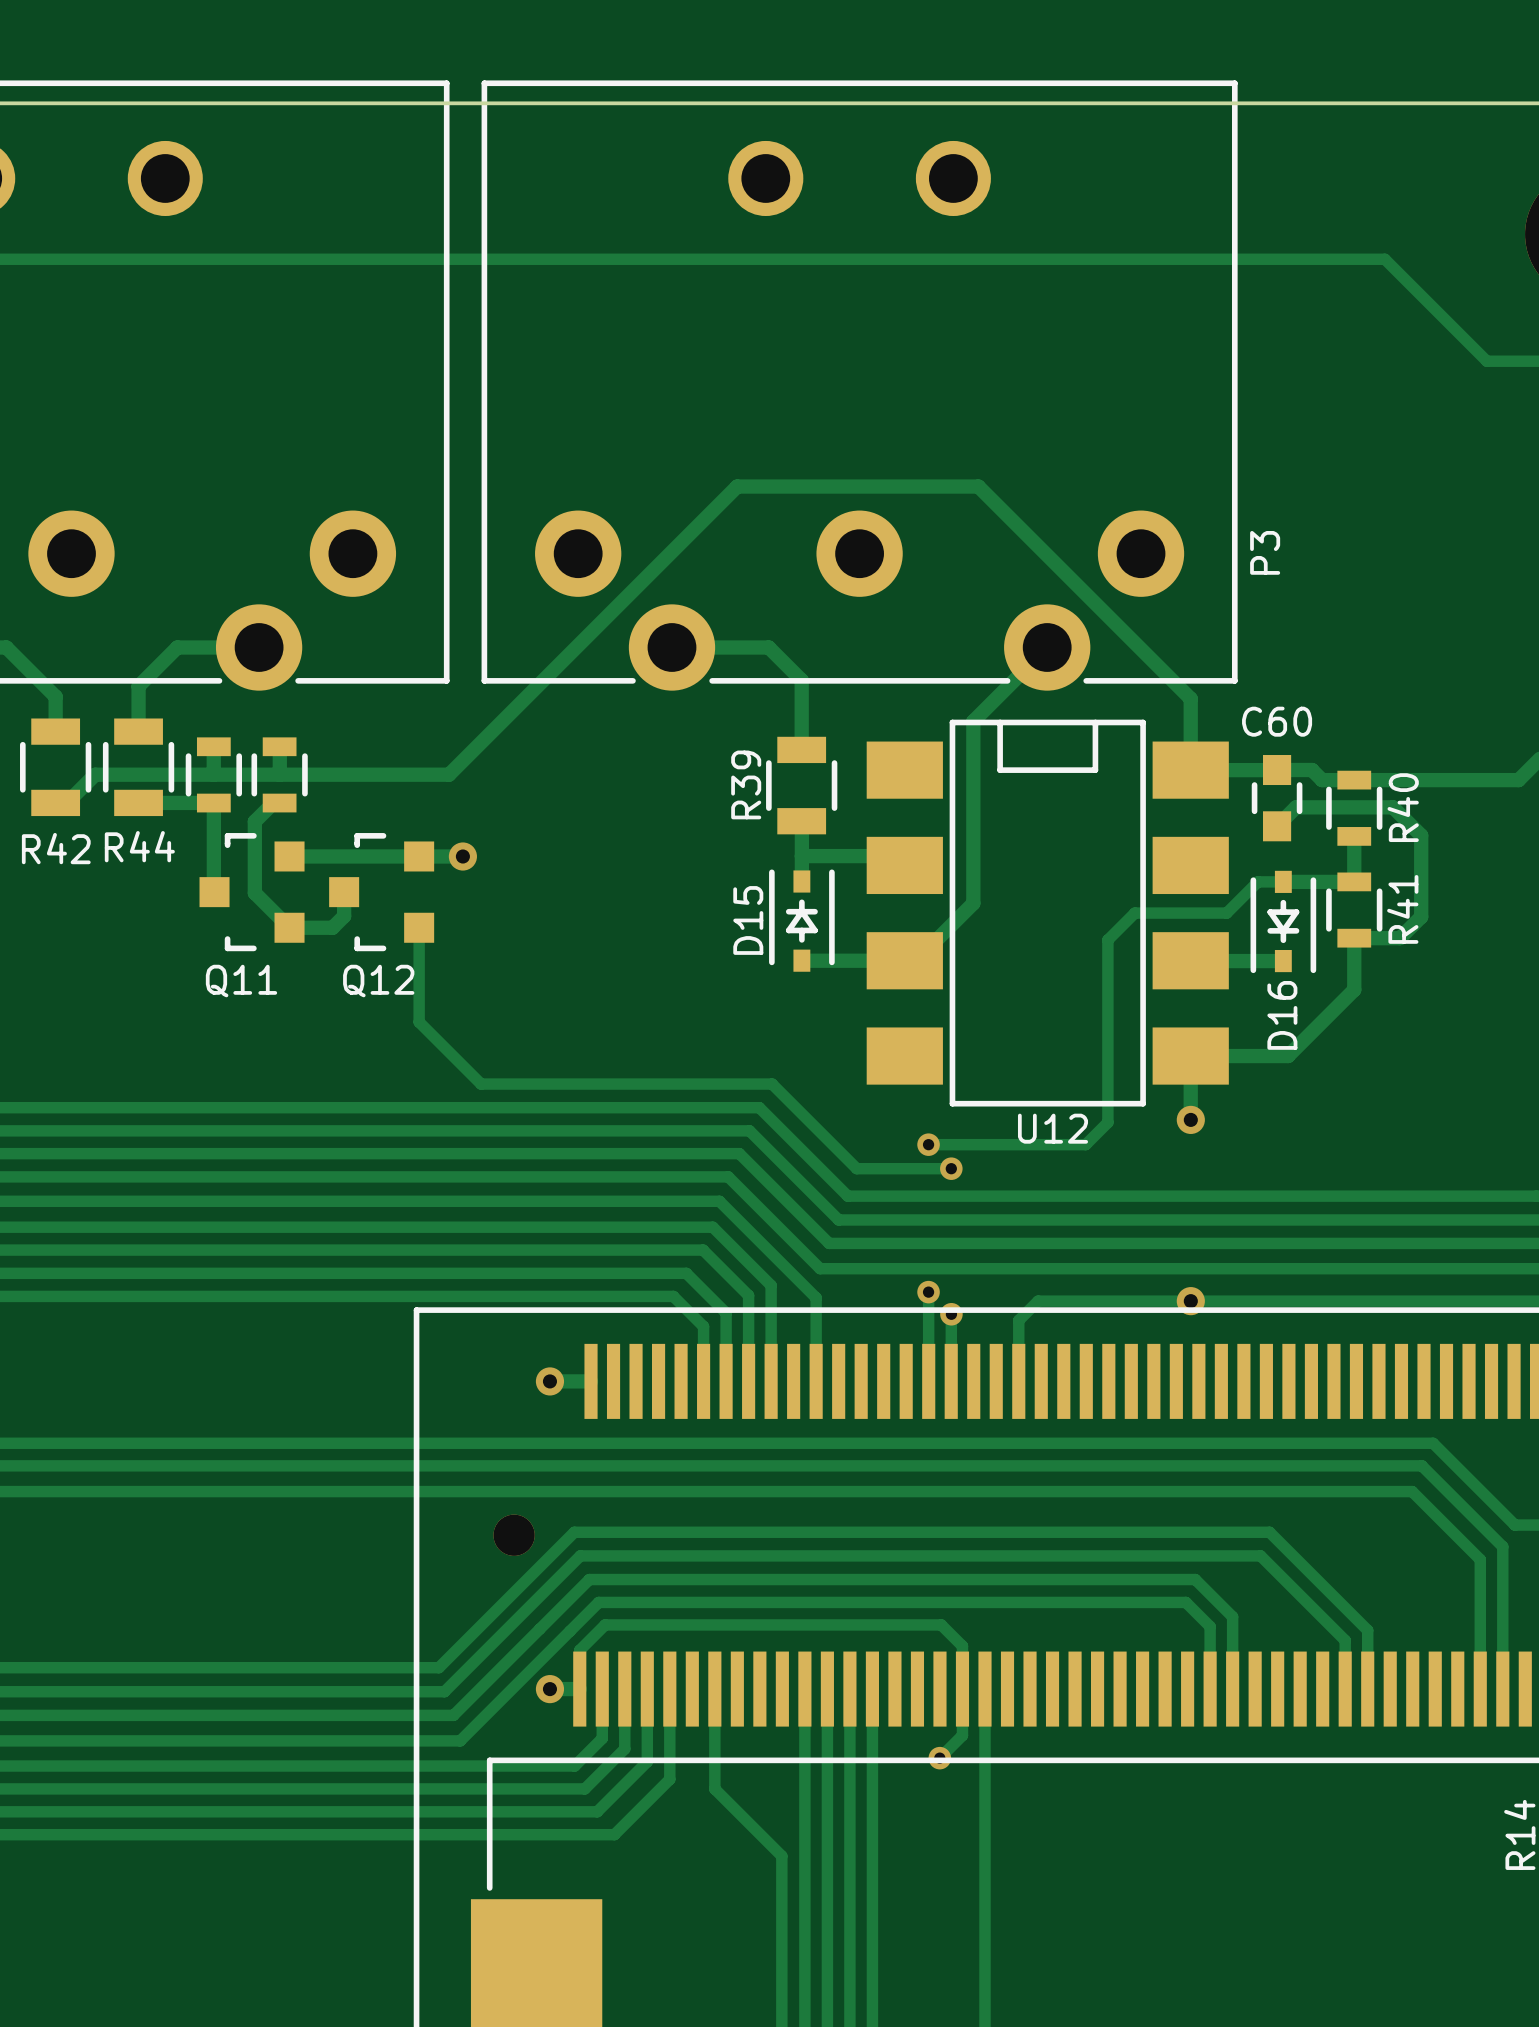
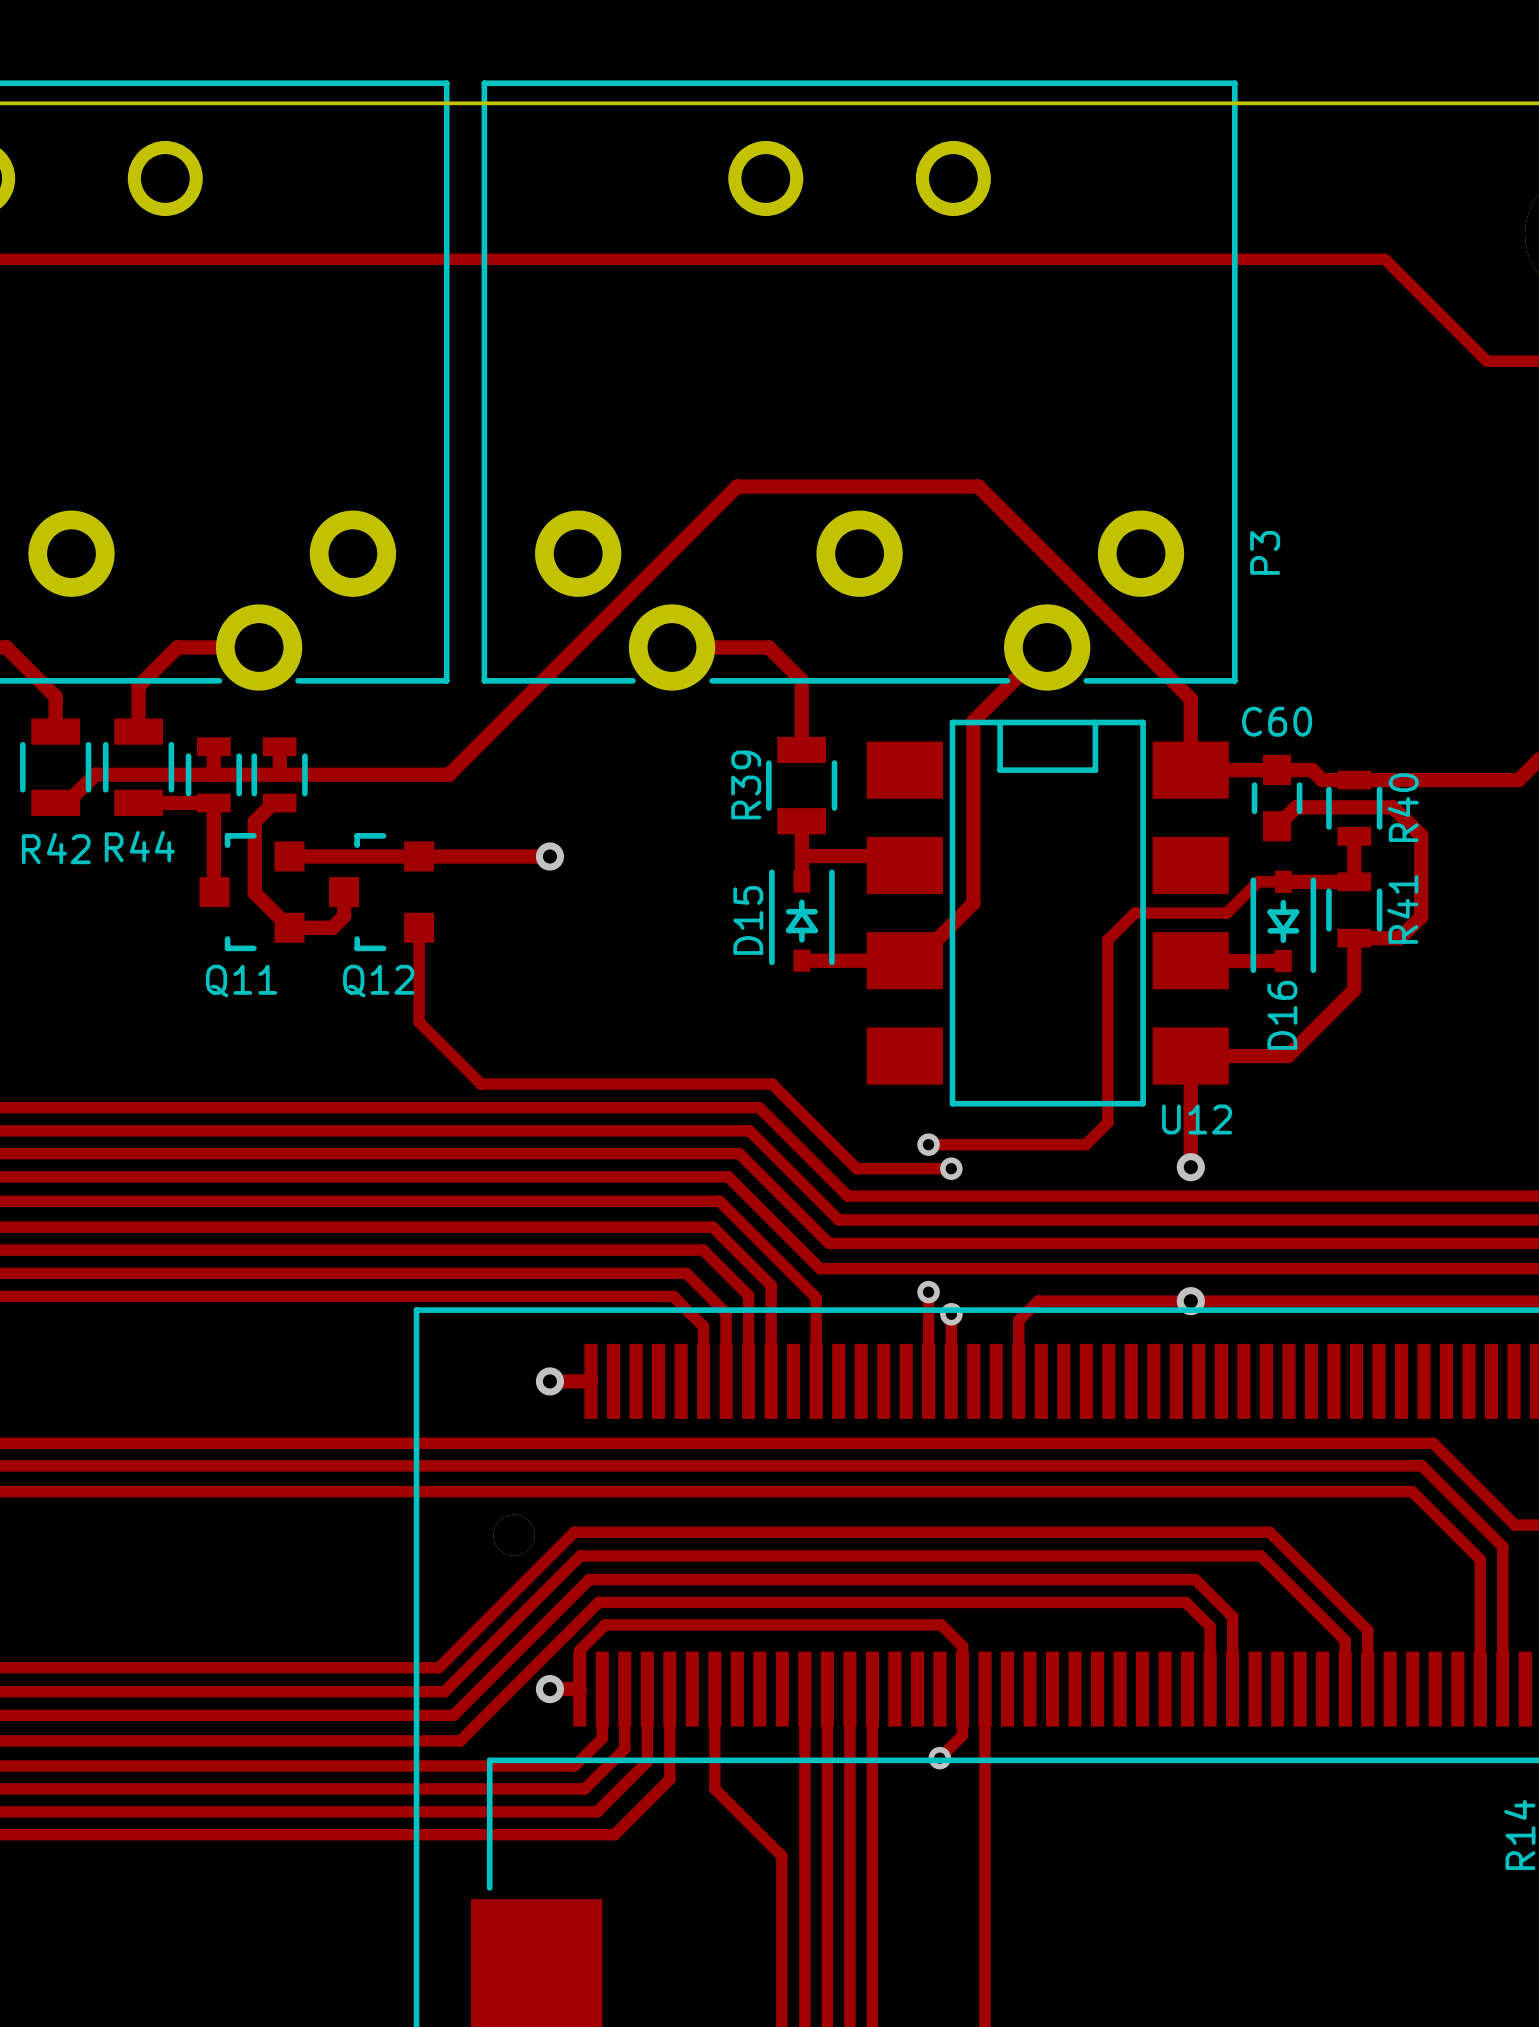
track: none -> (462, 856) (549, 856)
via position: (462, 856) -> (549, 856)
track: none -> (1190, 1119) (1190, 1167)
via position: (1190, 1119) -> (1190, 1167)
U12 name position: U12 (1052, 1128) -> U12 (1197, 1119)

